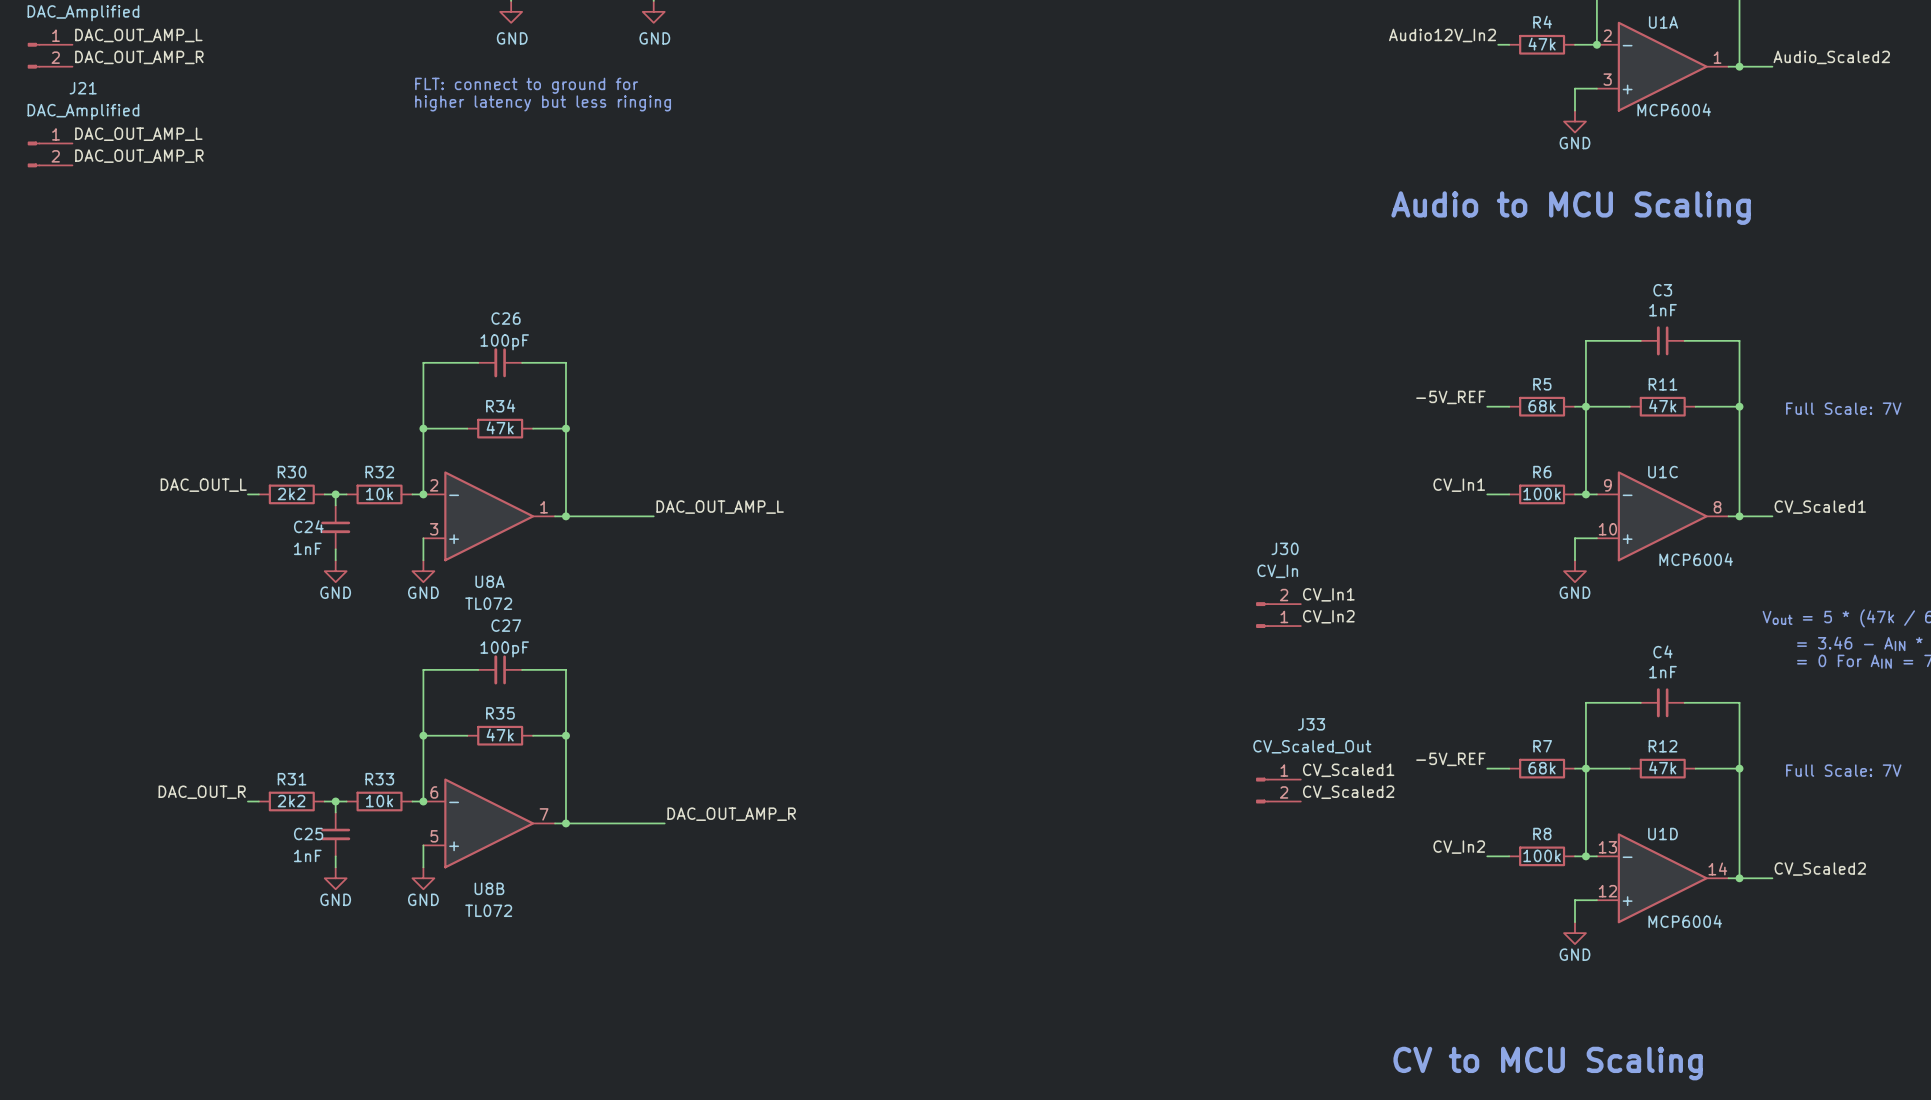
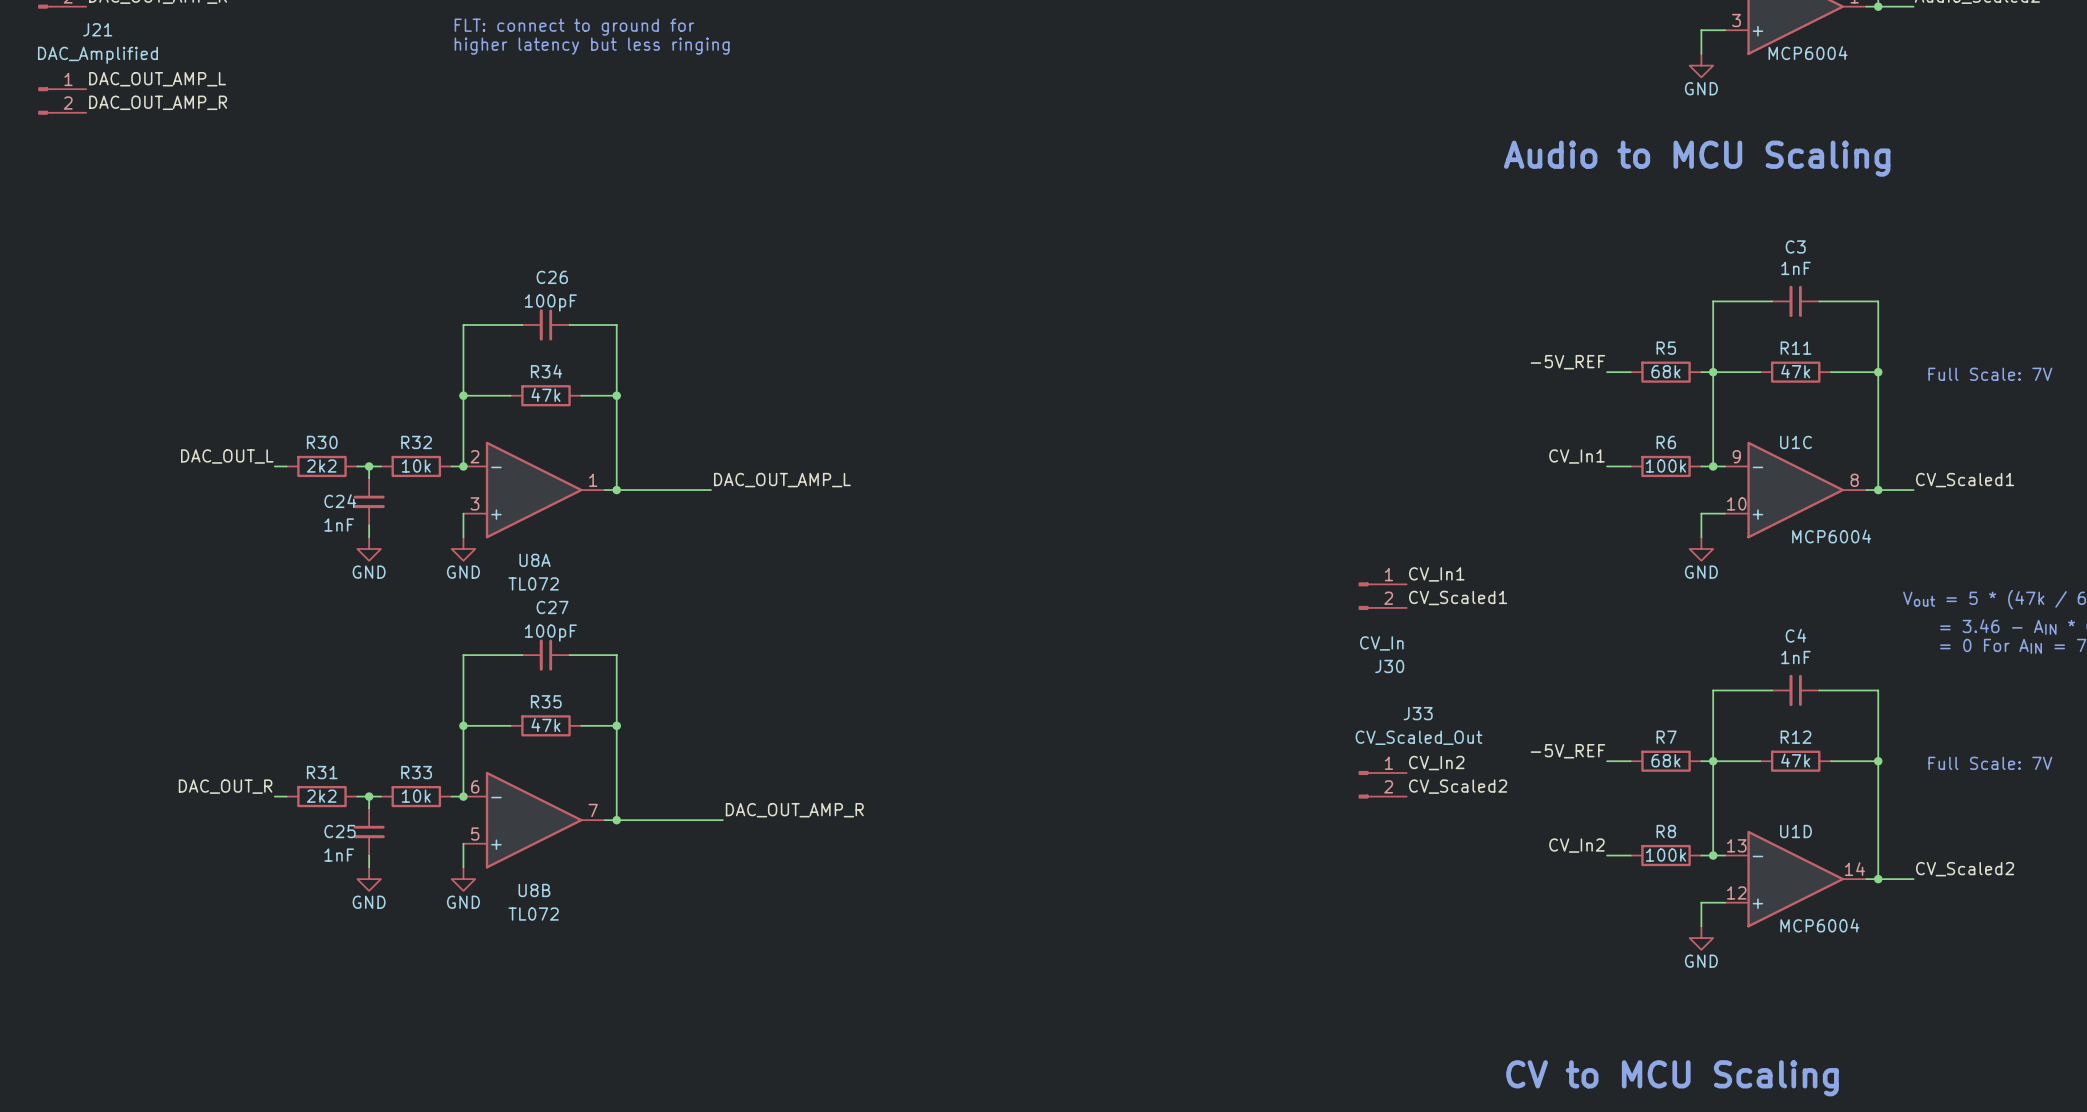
J30 flip: as is (1262, 615) -> up-down (1365, 596)
label: CV_In2 (1328, 616) -> CV_Scaled1 (1458, 597)
label: CV_Scaled1 (1348, 770) -> CV_In2 (1436, 763)

